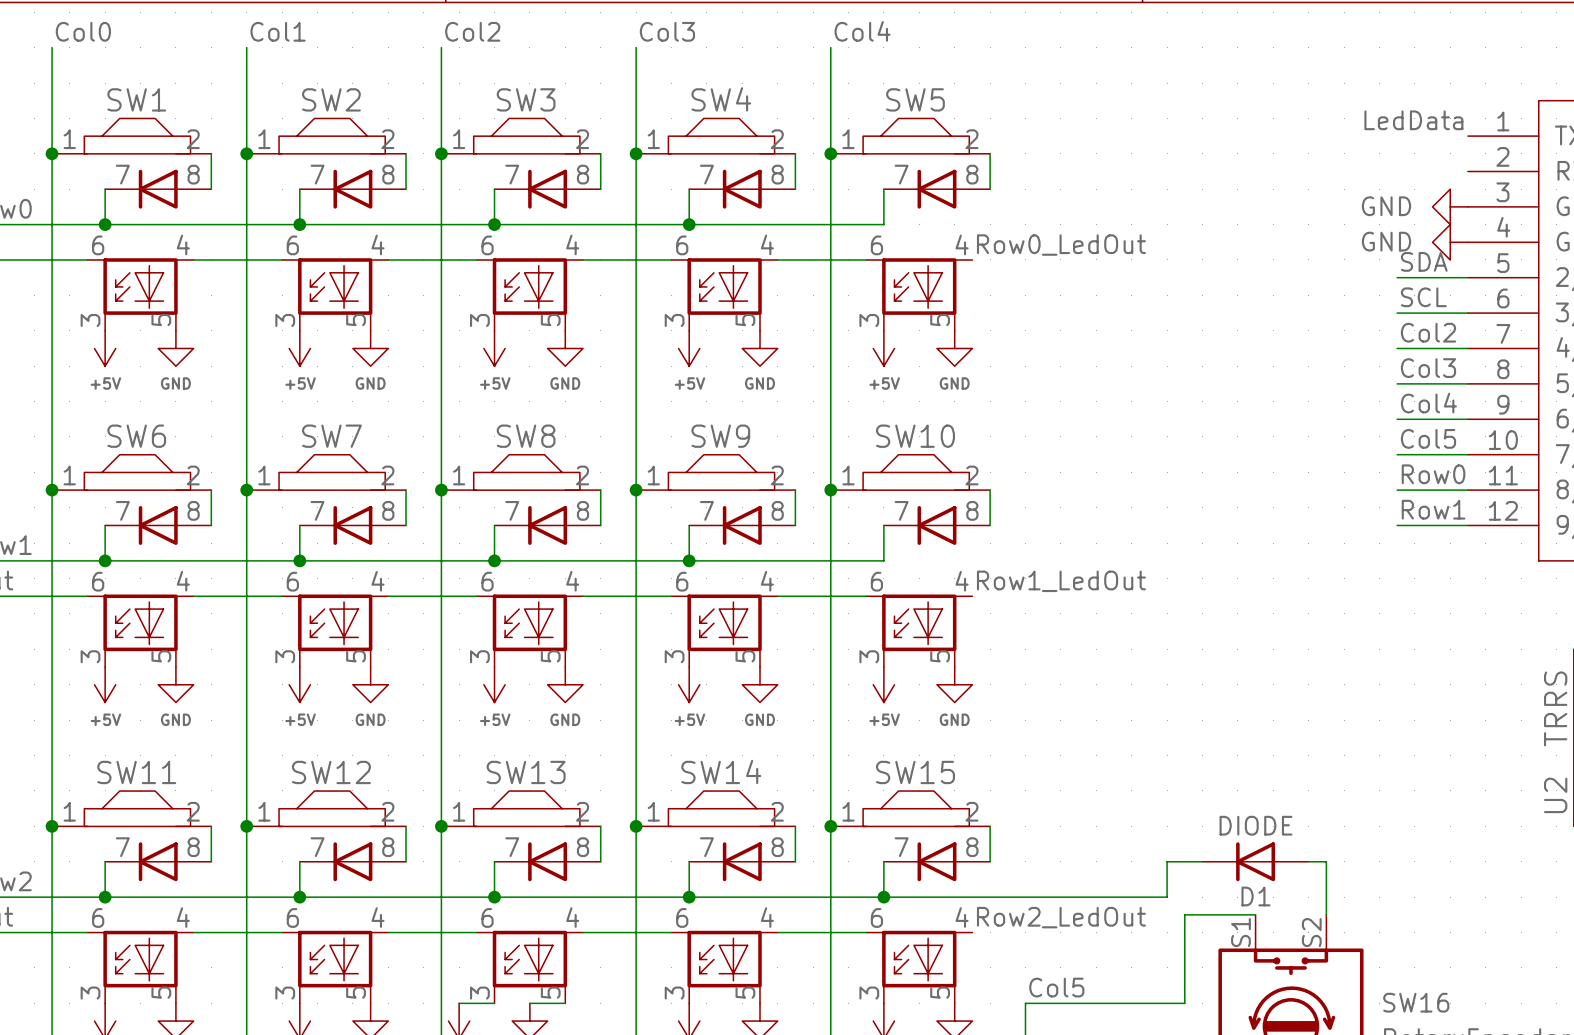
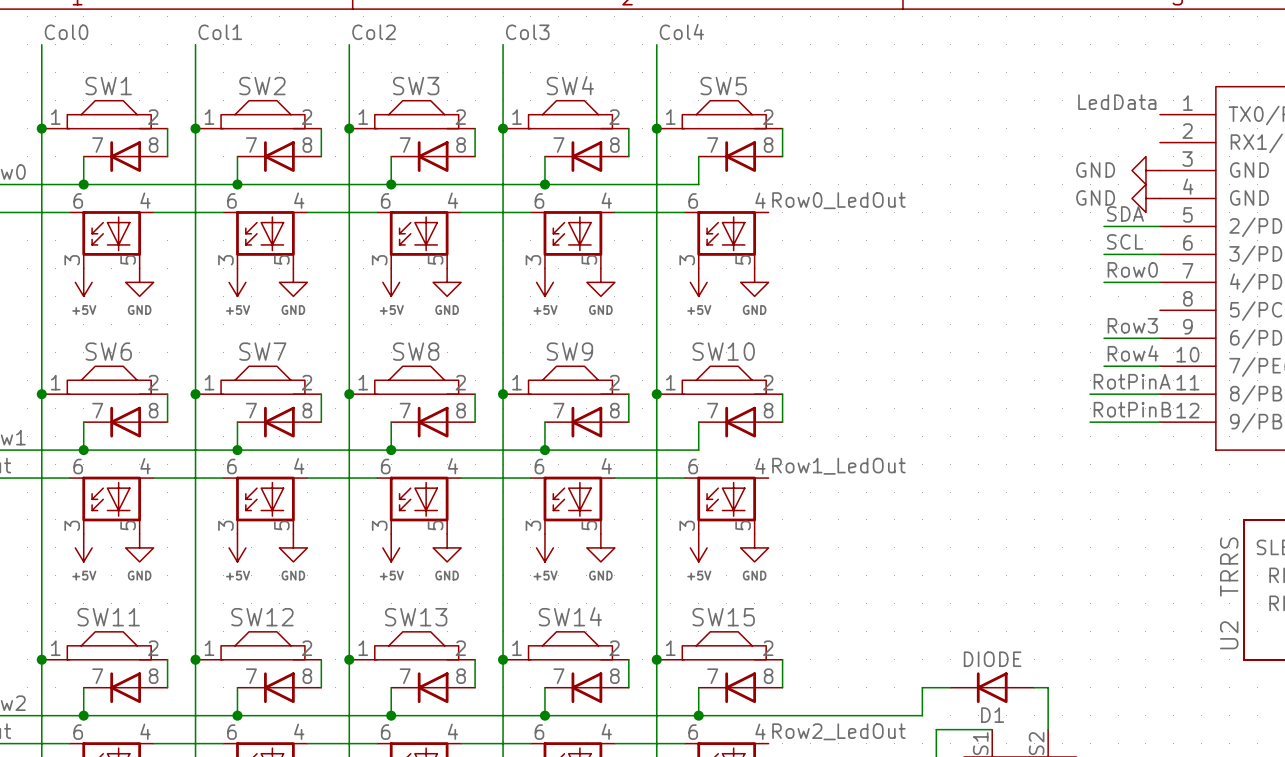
label: Col2 (1428, 332) -> Row0 (1132, 269)
label: Col3 (1428, 368) -> none
wire: (1397, 383) (1467, 383) -> none
label: Col4 (1428, 403) -> Row3 (1132, 325)
label: Col5 (1428, 438) -> Row4 (1133, 353)
label: none -> RotPinA (1132, 381)
label: Row0 (1433, 474) -> none
wire: none -> (1090, 394) (1104, 394)
label: Row1 (1433, 509) -> none
label: none -> RotPinB (1132, 409)
wire: none -> (1090, 422) (1104, 422)

